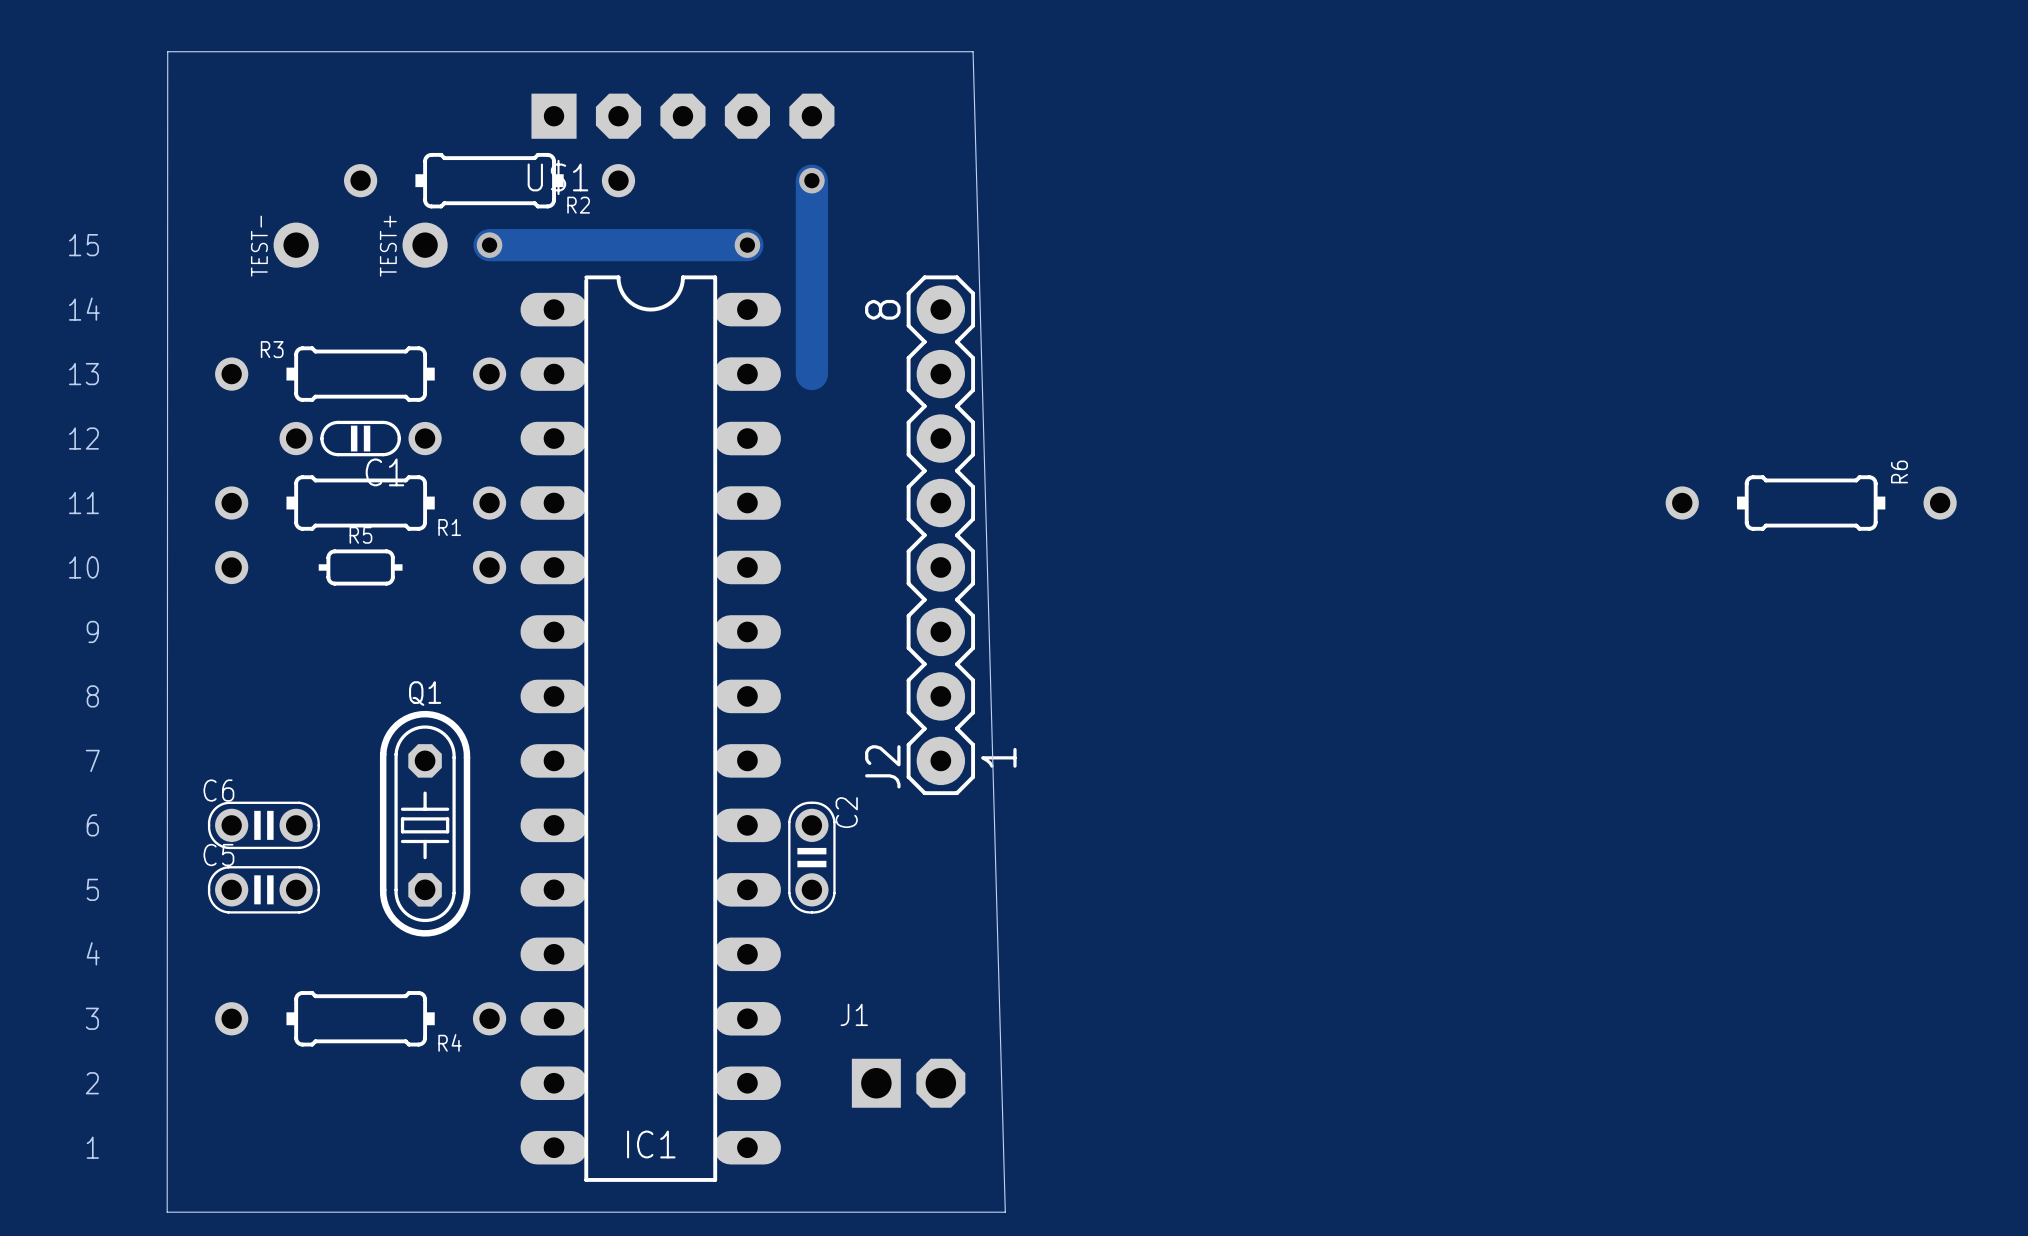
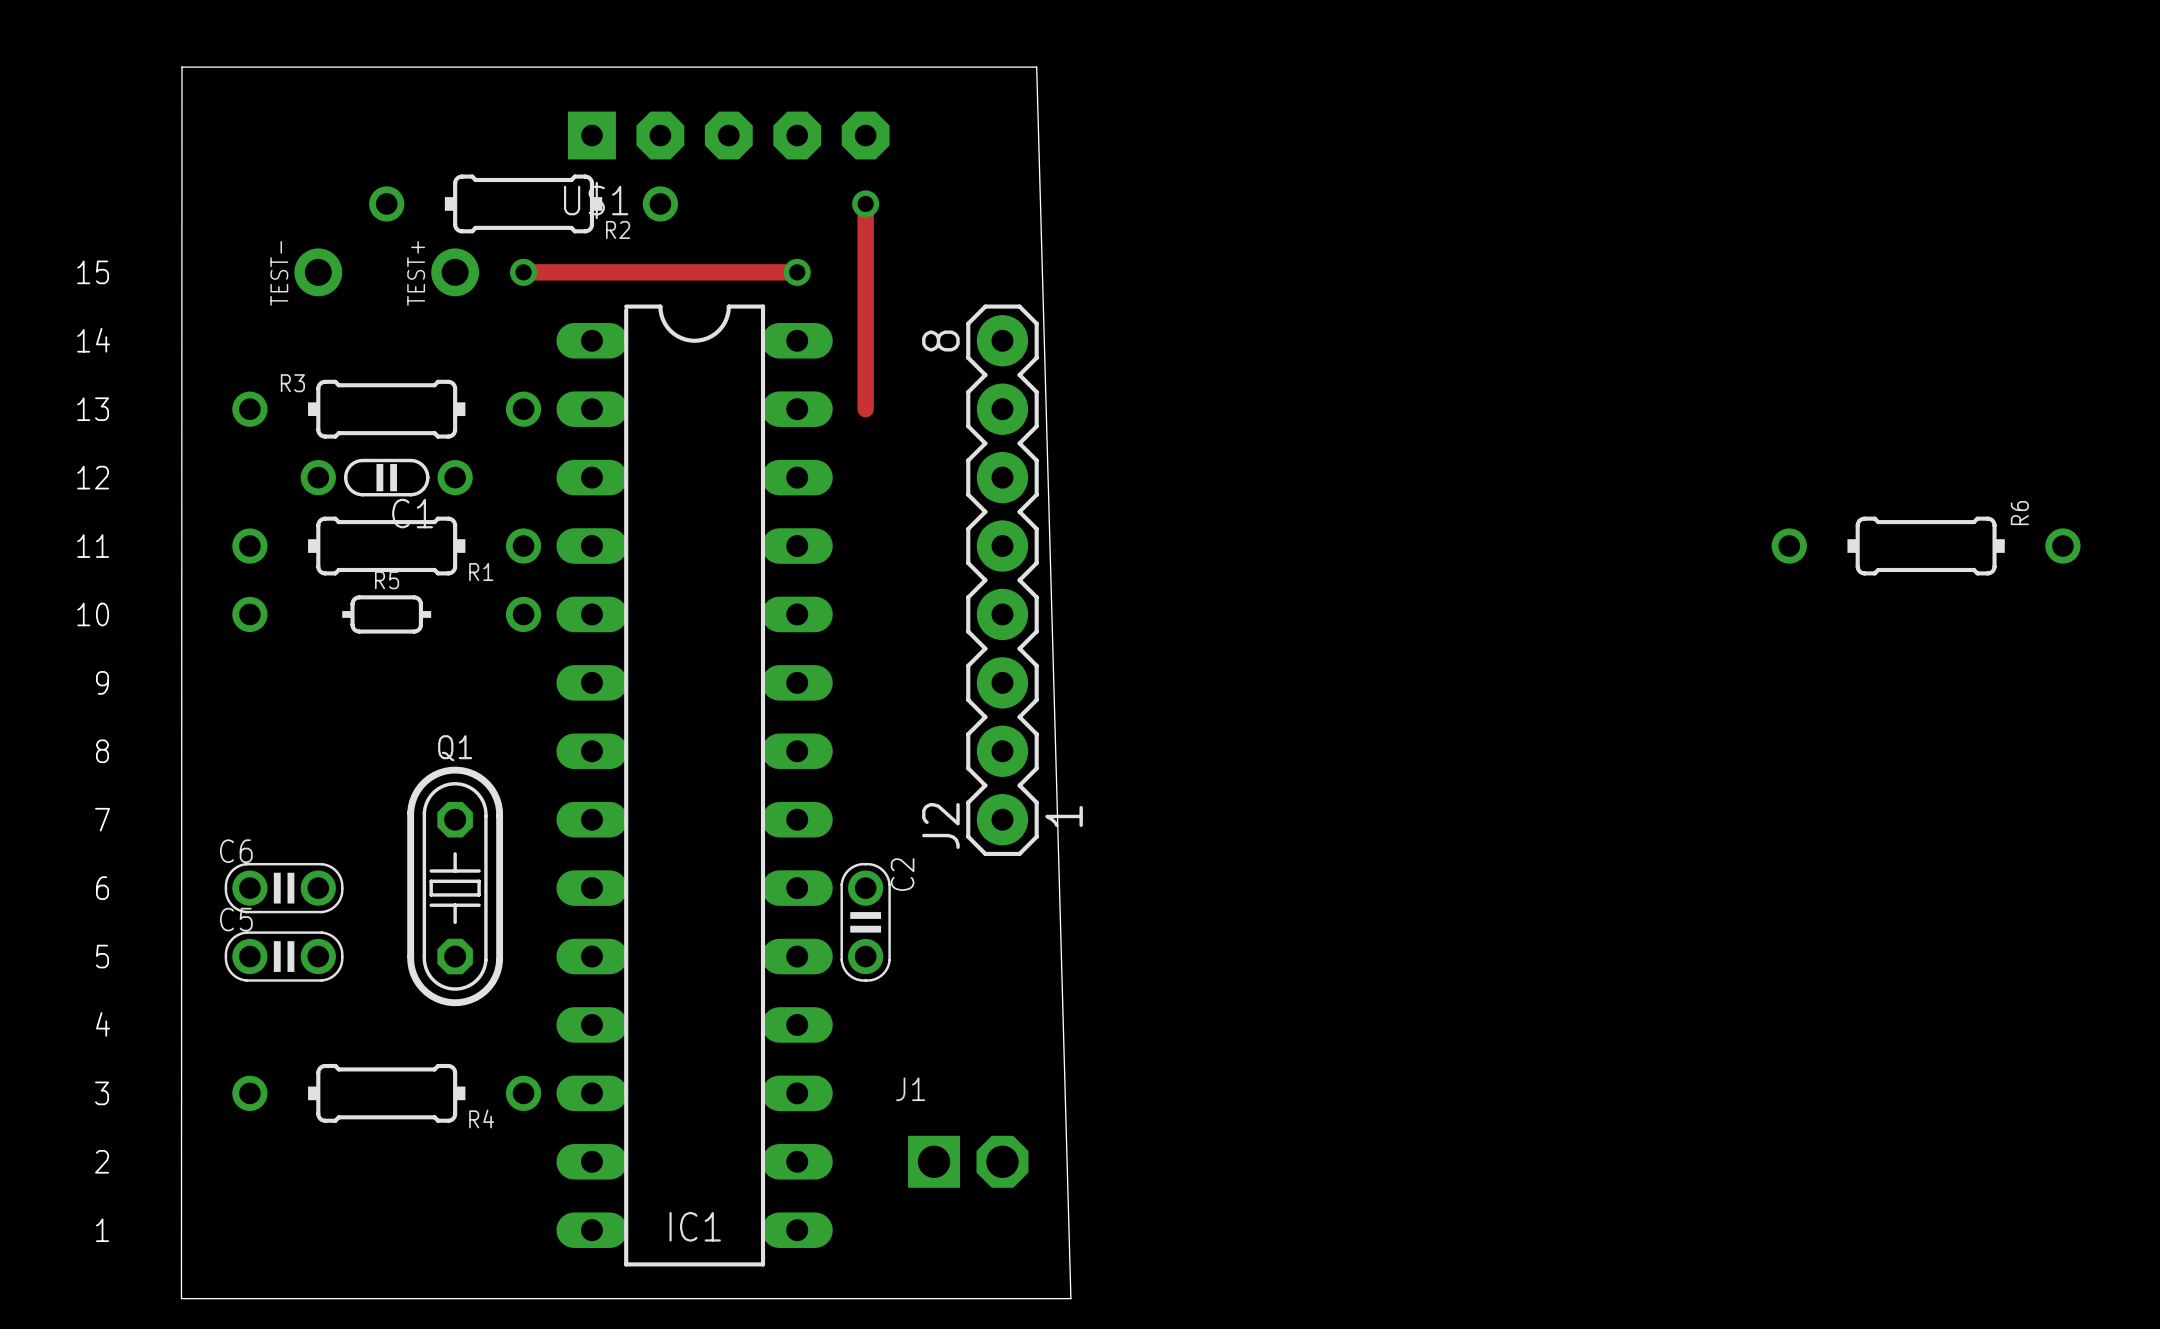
track width: thick (811, 180) (811, 374) -> thin (865, 203) (865, 409)
track width: thick (489, 245) (747, 245) -> thin (523, 272) (797, 272)

